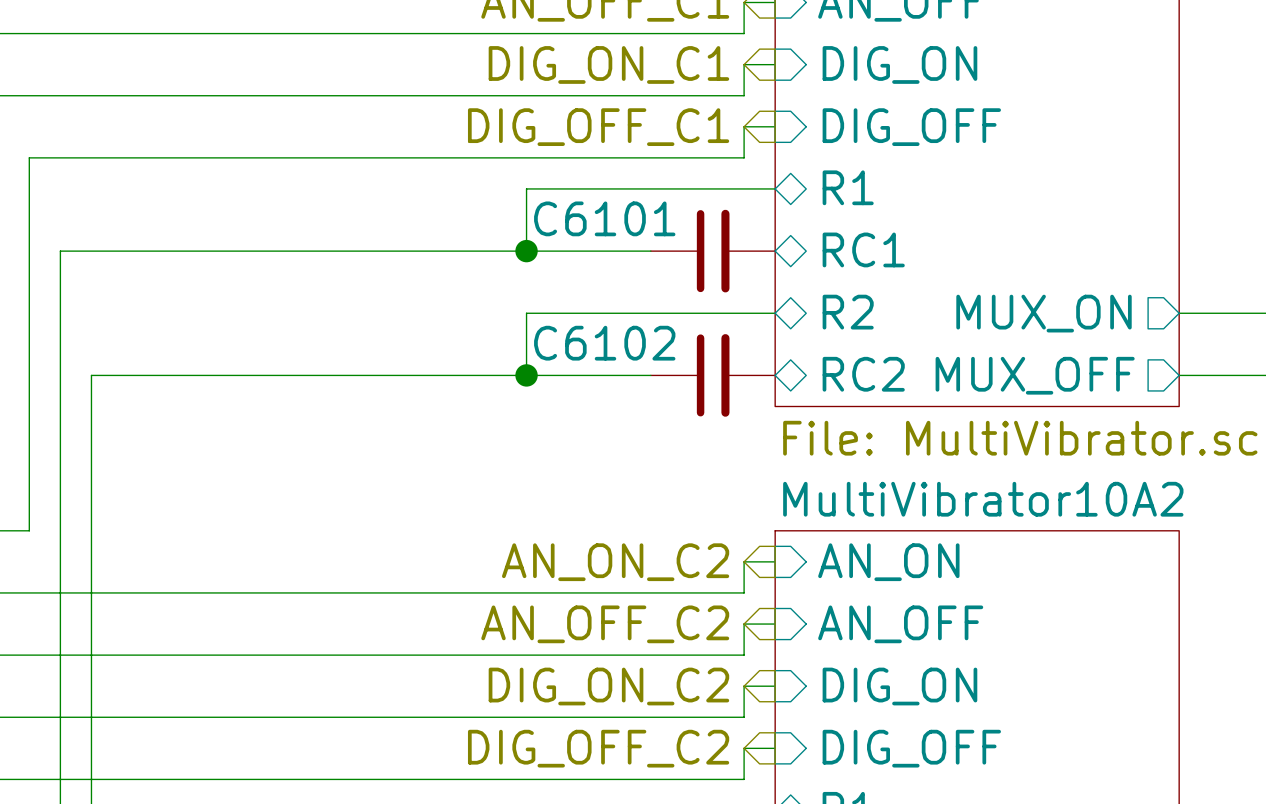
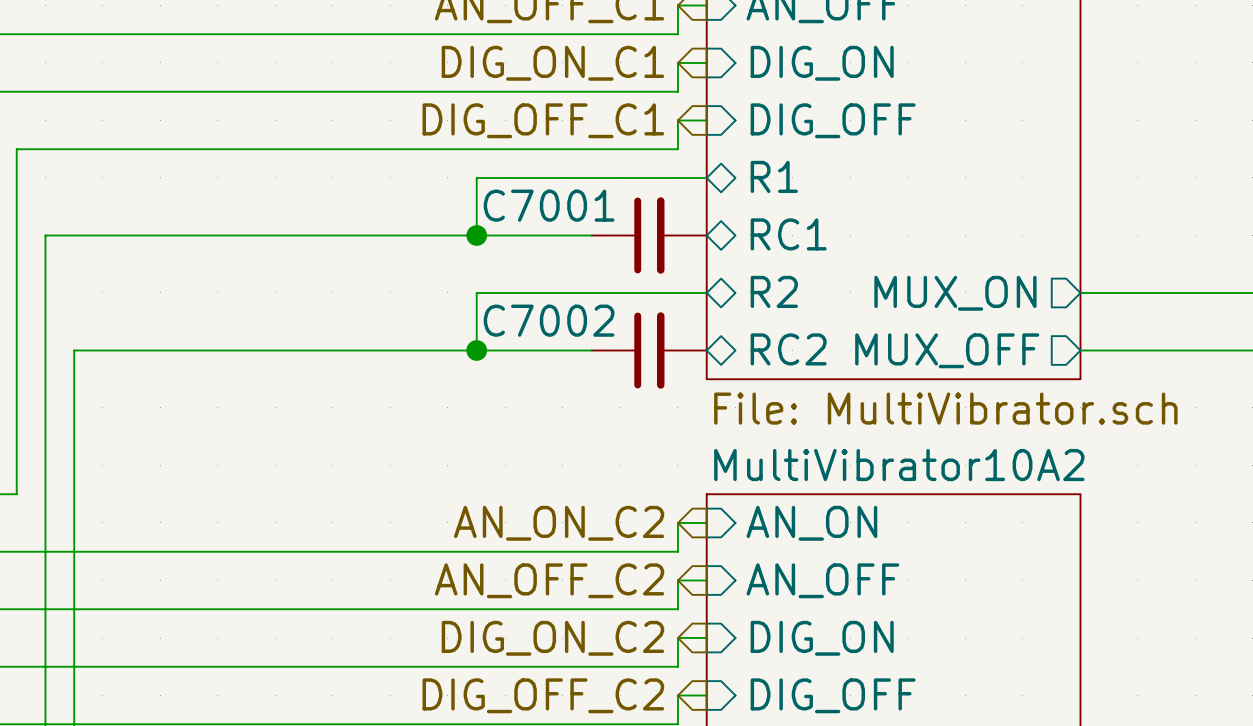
C6101 name: C6101 (604, 218) -> C7001 (549, 205)
C6102 name: C6102 (604, 343) -> C7002 (549, 320)

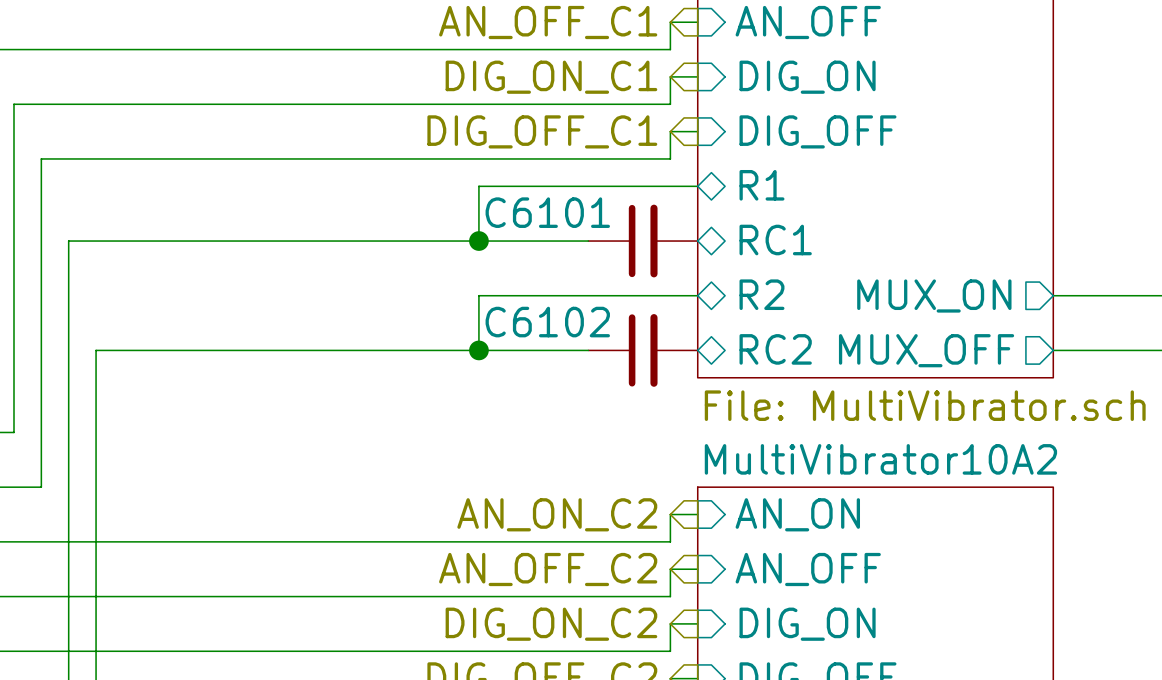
C7001 name: C7001 (549, 205) -> C6101 (547, 212)
C7002 name: C7002 (549, 320) -> C6102 (547, 322)

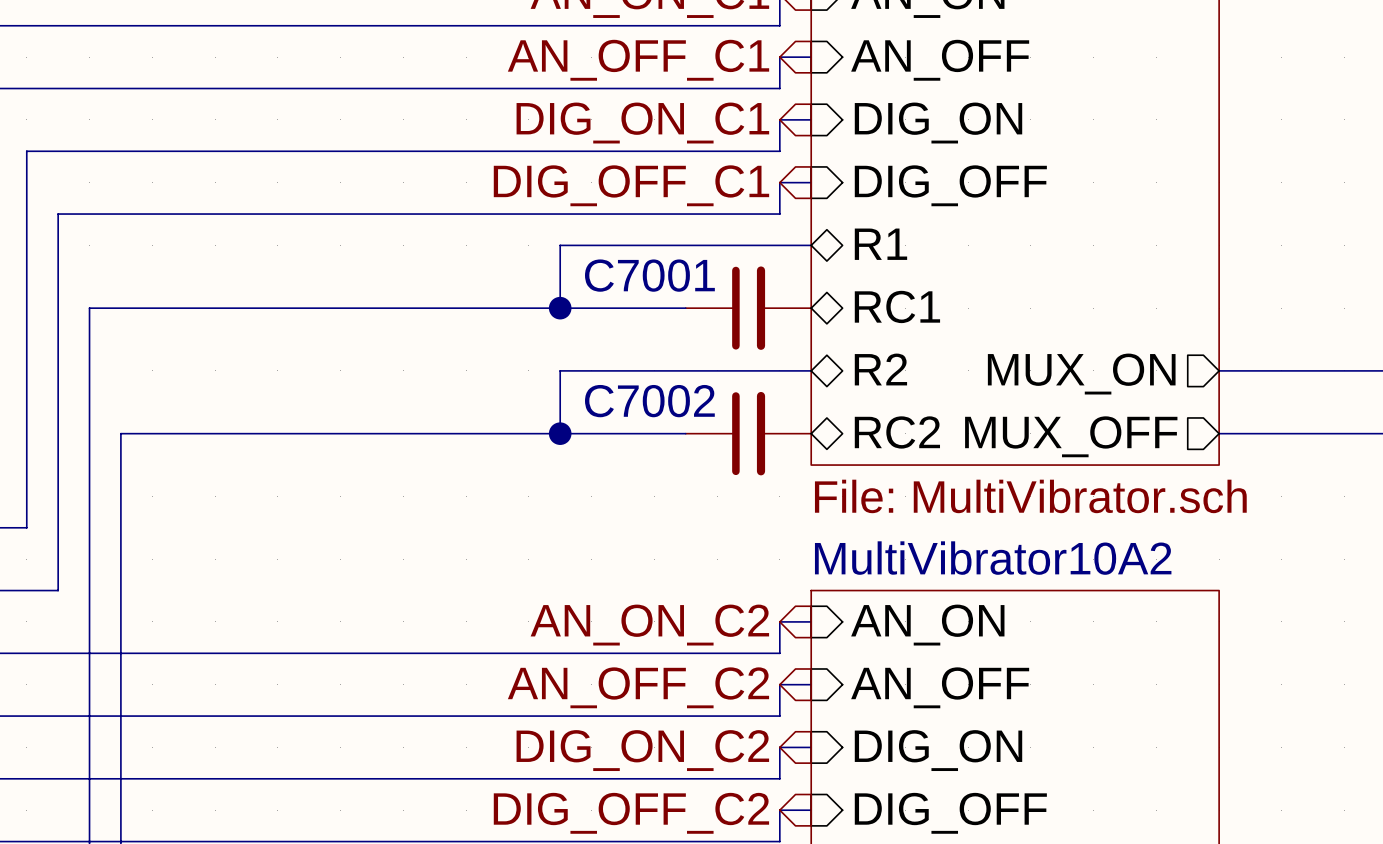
C6101 name: C6101 (547, 212) -> C7001 (649, 275)
C6102 name: C6102 (547, 322) -> C7002 (649, 401)

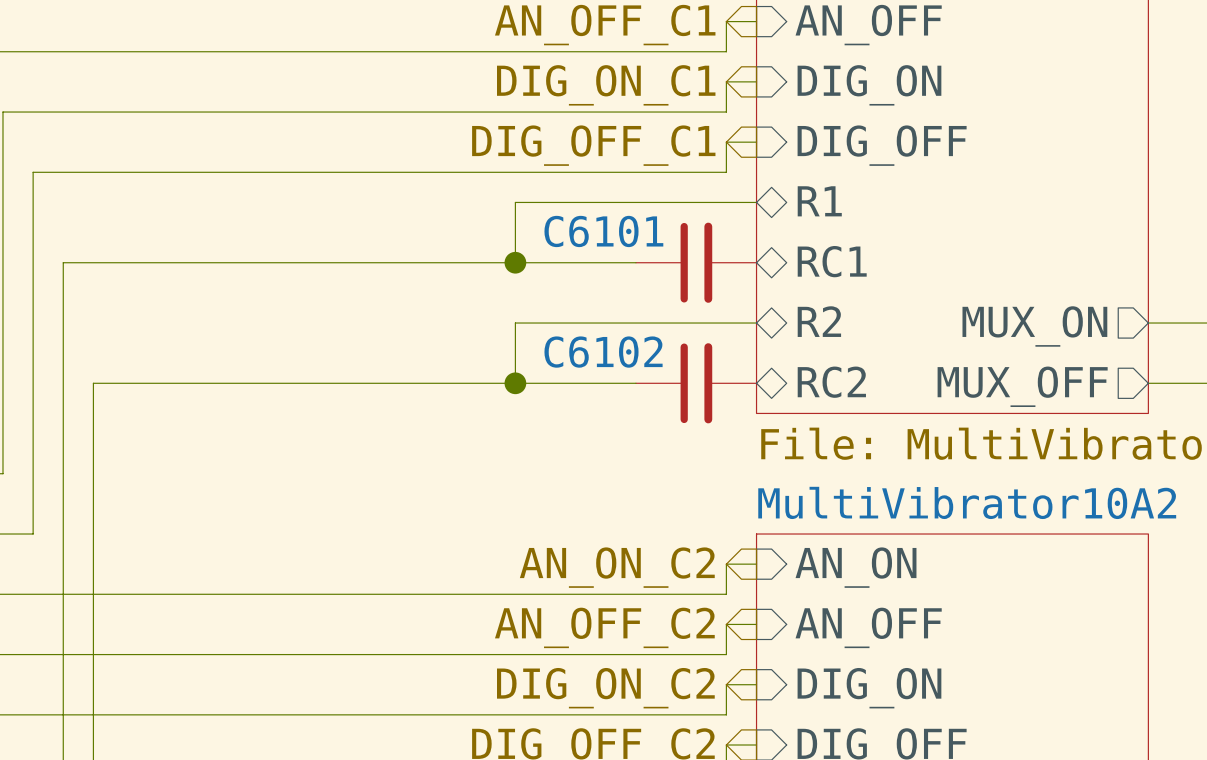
C7001 name: C7001 (649, 275) -> C6101 (603, 231)
C7002 name: C7002 (649, 401) -> C6102 (603, 352)

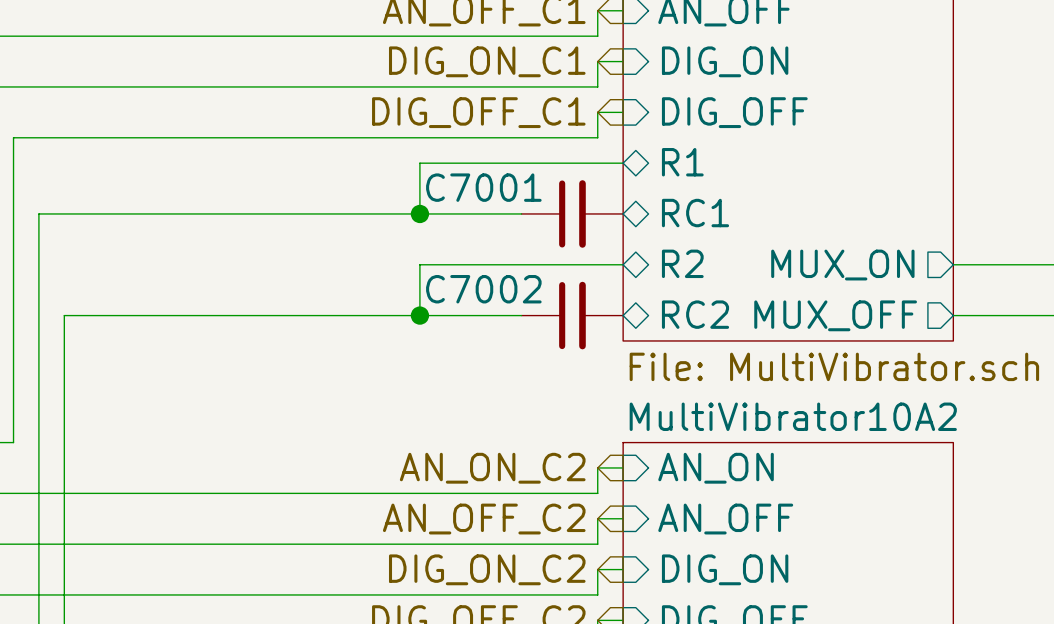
C6101 name: C6101 (603, 231) -> C7001 (483, 187)
C6102 name: C6102 (603, 352) -> C7002 (483, 289)

